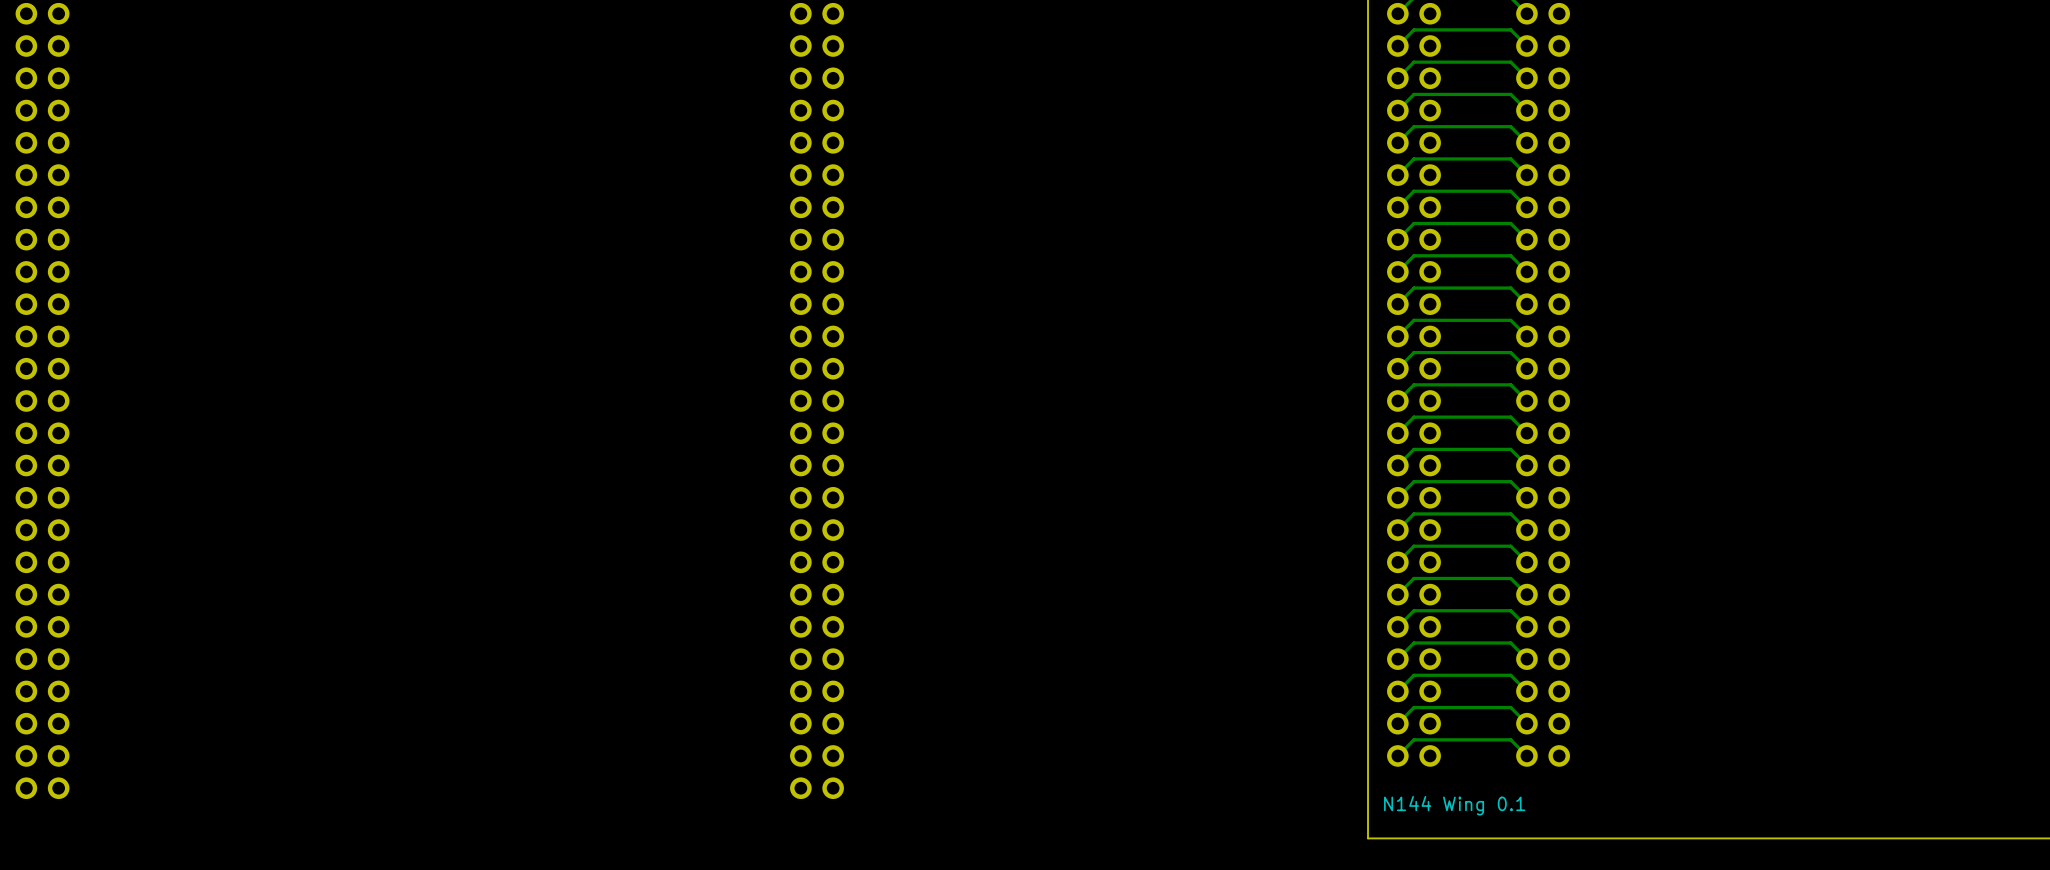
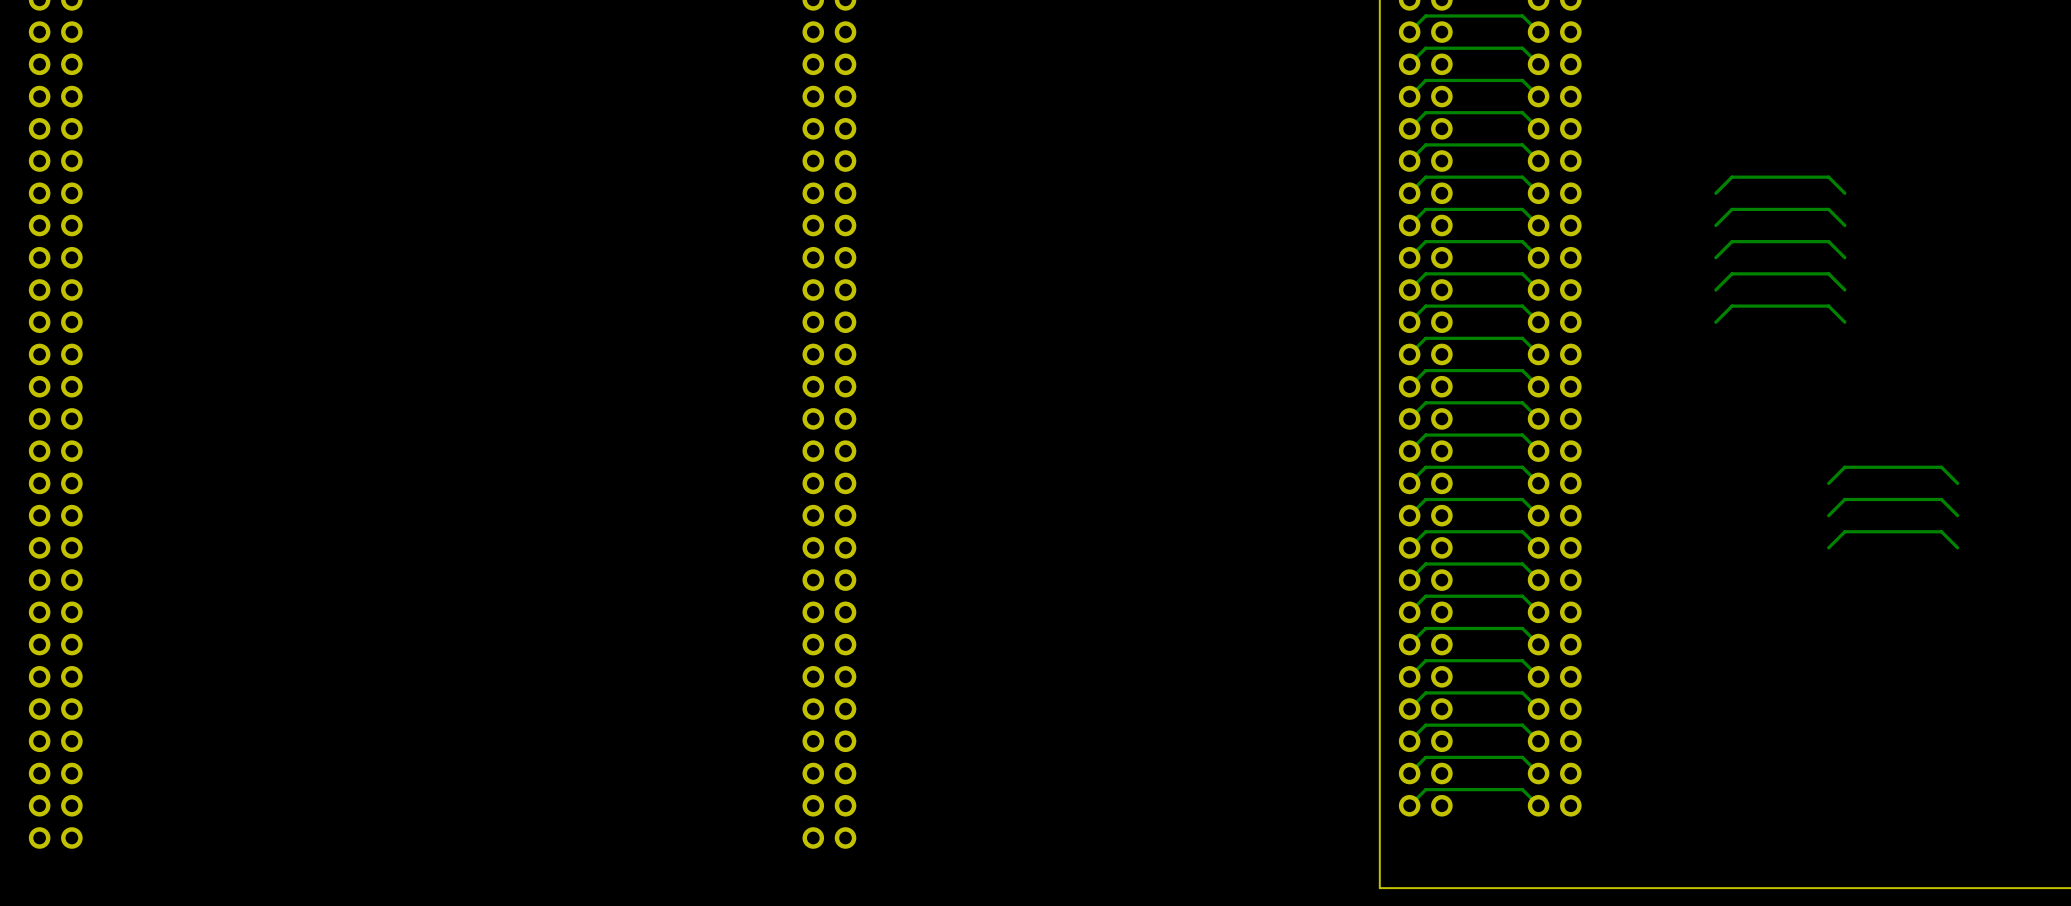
track: none -> (1844, 193) (1828, 177) (1731, 177) (1715, 193)
track: none -> (1844, 225) (1828, 209) (1731, 209) (1715, 225)
track: none -> (1844, 257) (1828, 241) (1731, 241) (1715, 257)
track: none -> (1844, 289) (1828, 273) (1731, 273) (1715, 289)
track: none -> (1844, 322) (1828, 306) (1731, 306) (1715, 322)
track: none -> (1957, 483) (1941, 467) (1844, 467) (1828, 483)
track: none -> (1957, 515) (1941, 499) (1844, 499) (1828, 515)
track: none -> (1957, 547) (1941, 531) (1844, 531) (1828, 547)
text: N144 Wing 0.1 (1454, 805) -> none

